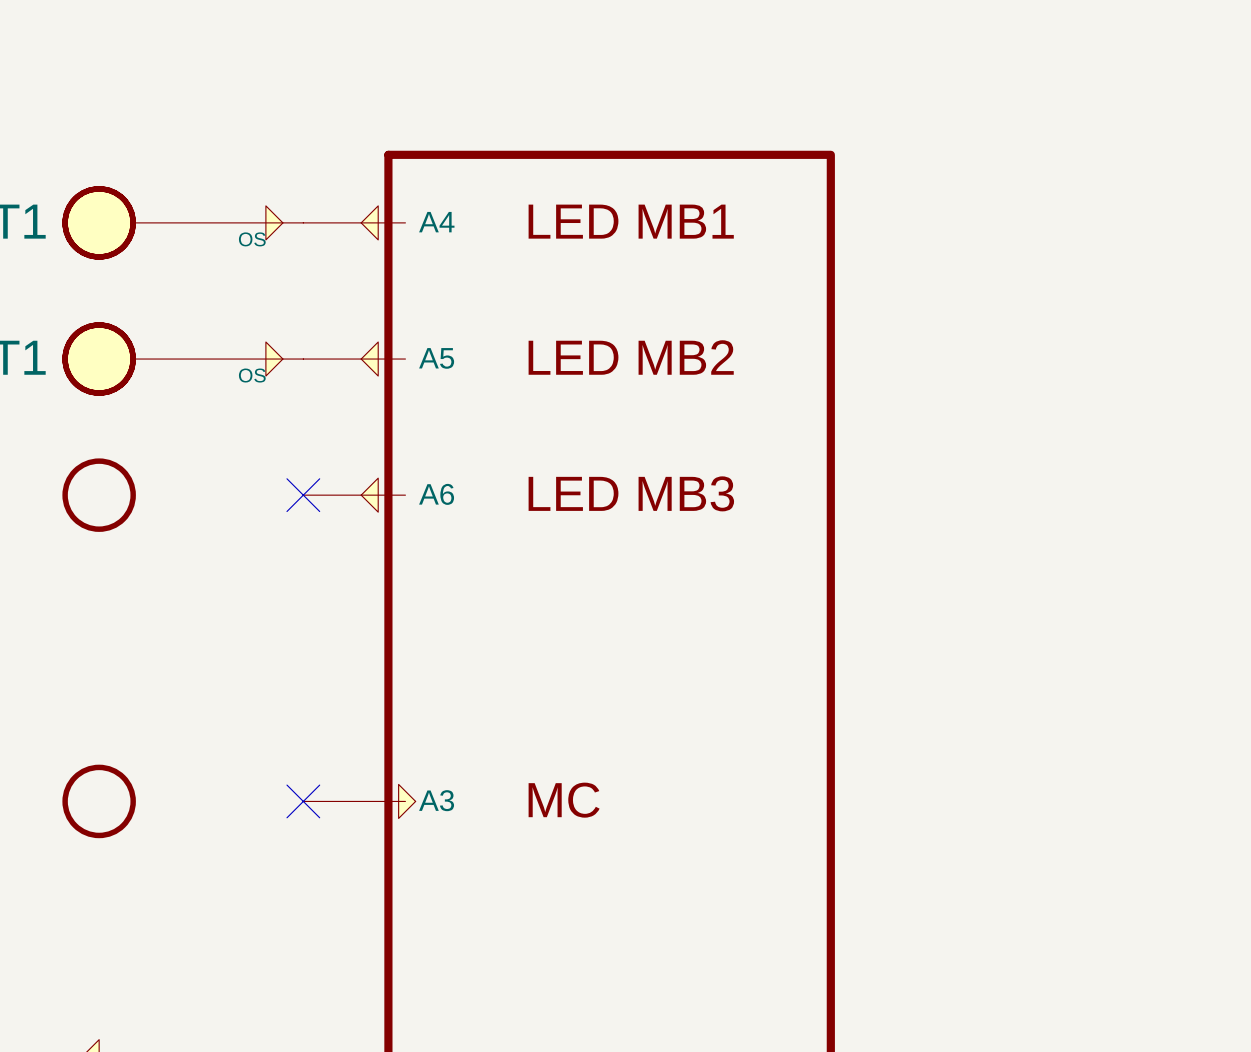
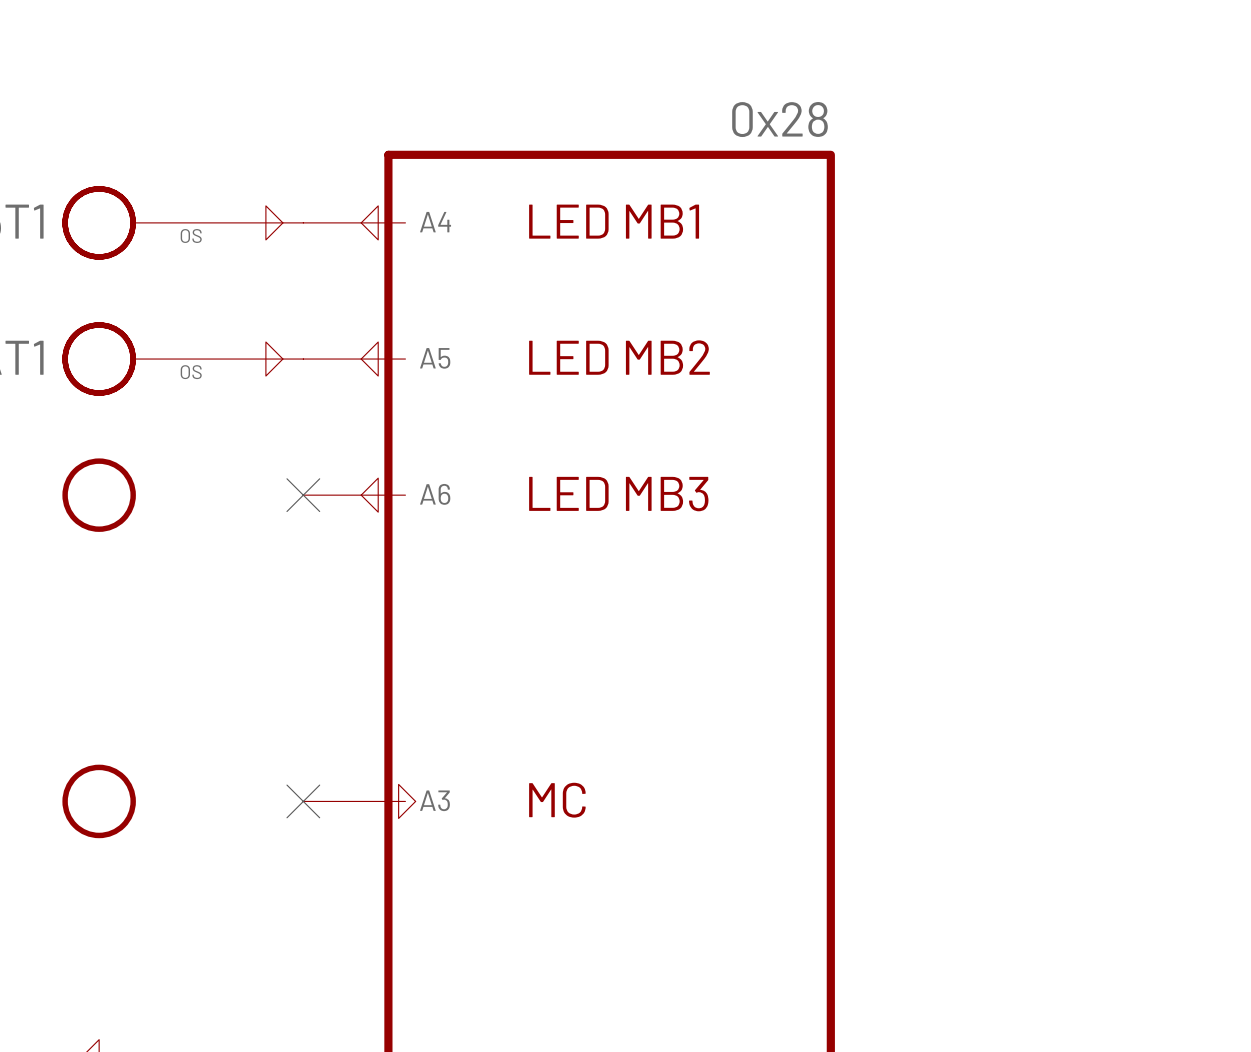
part value: none -> 0x28 (780, 119)
part value position: OS (252, 239) -> OS (191, 236)
part value position: OS (252, 375) -> OS (191, 372)

